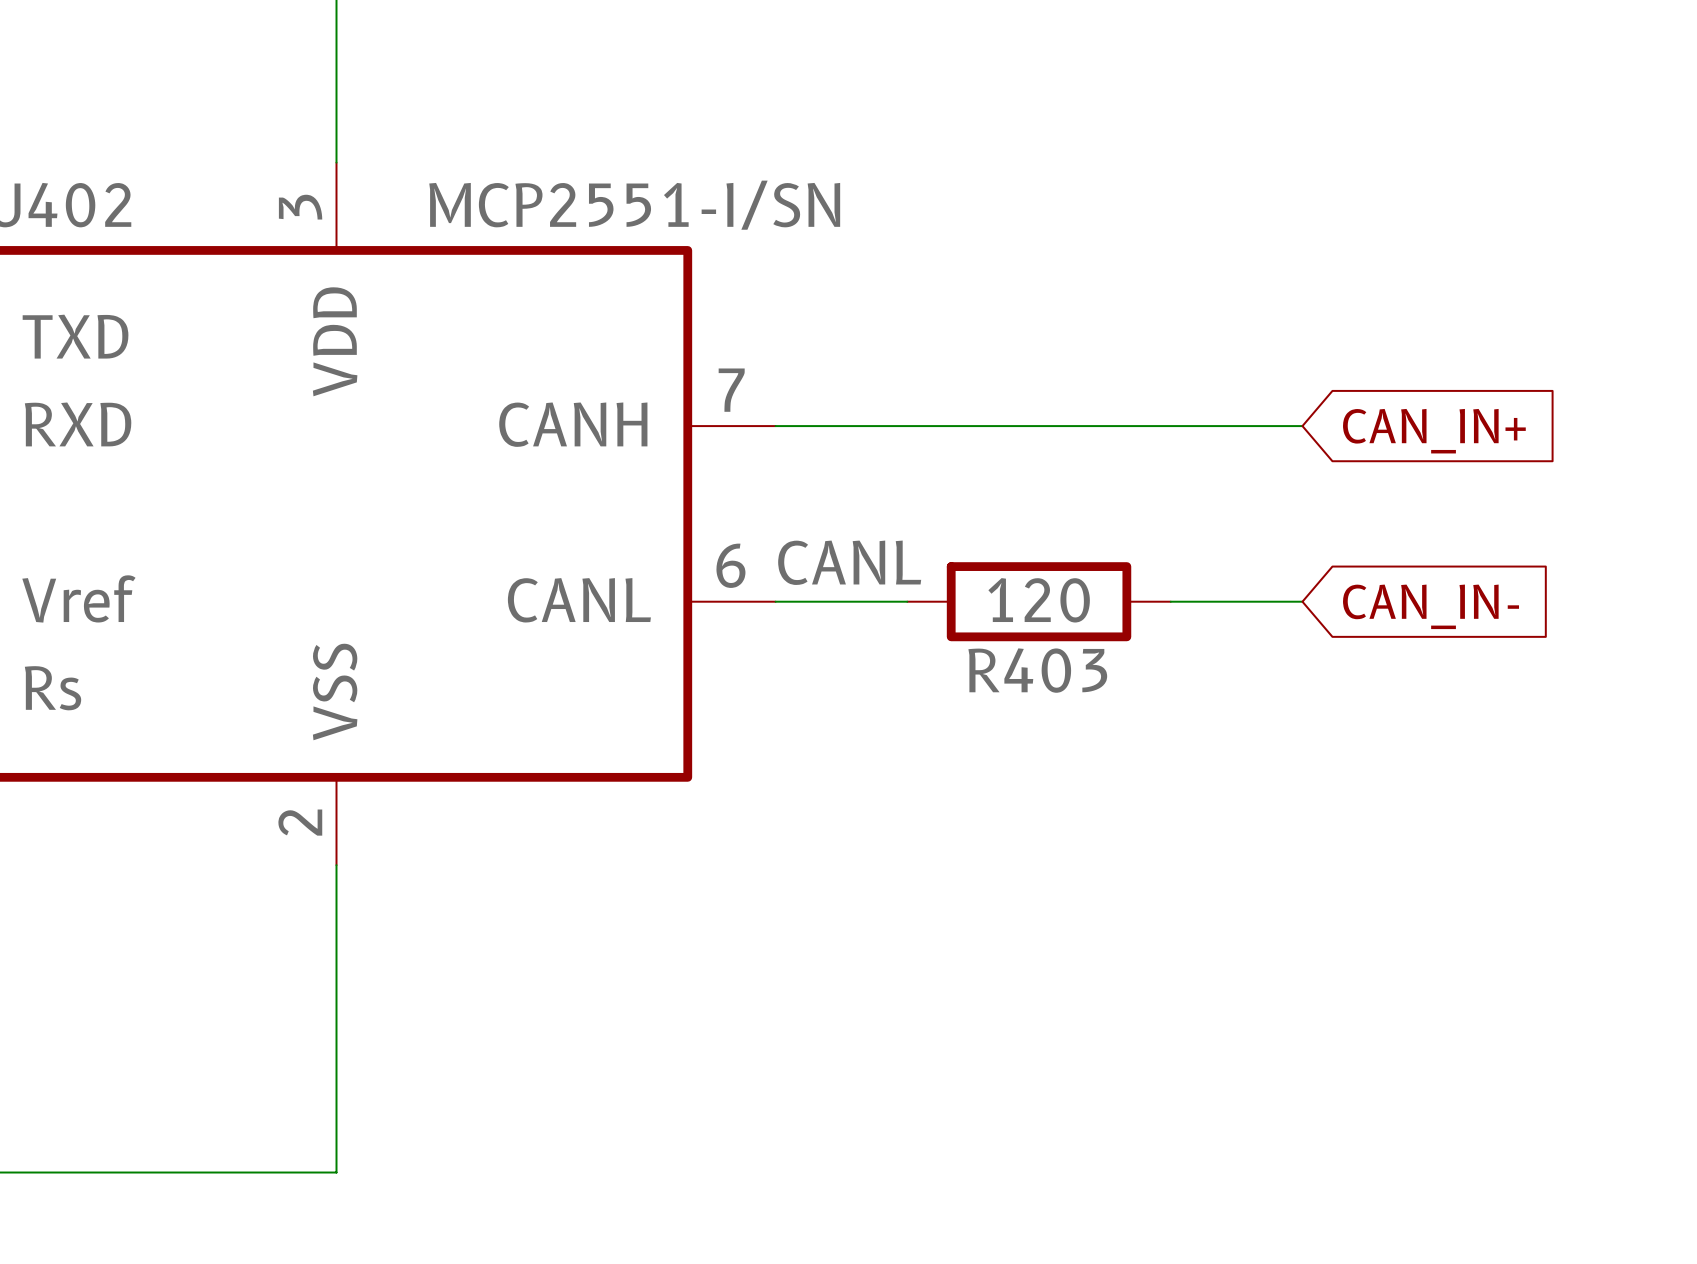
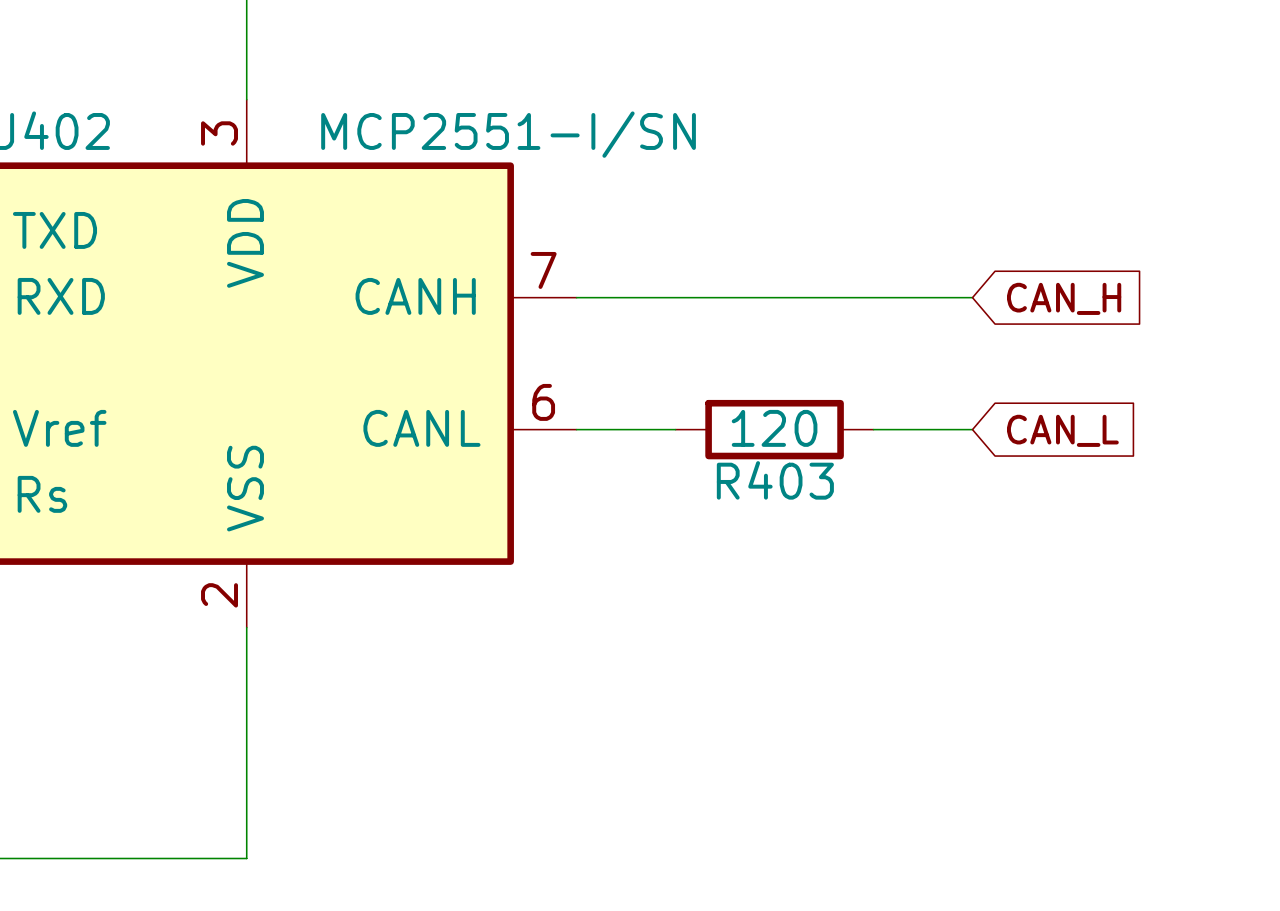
global label: CAN_IN+ (1434, 431) -> CAN_H (1064, 298)
label: CANL (849, 562) -> none
global label: CAN_IN- (1431, 606) -> CAN_L (1062, 430)

